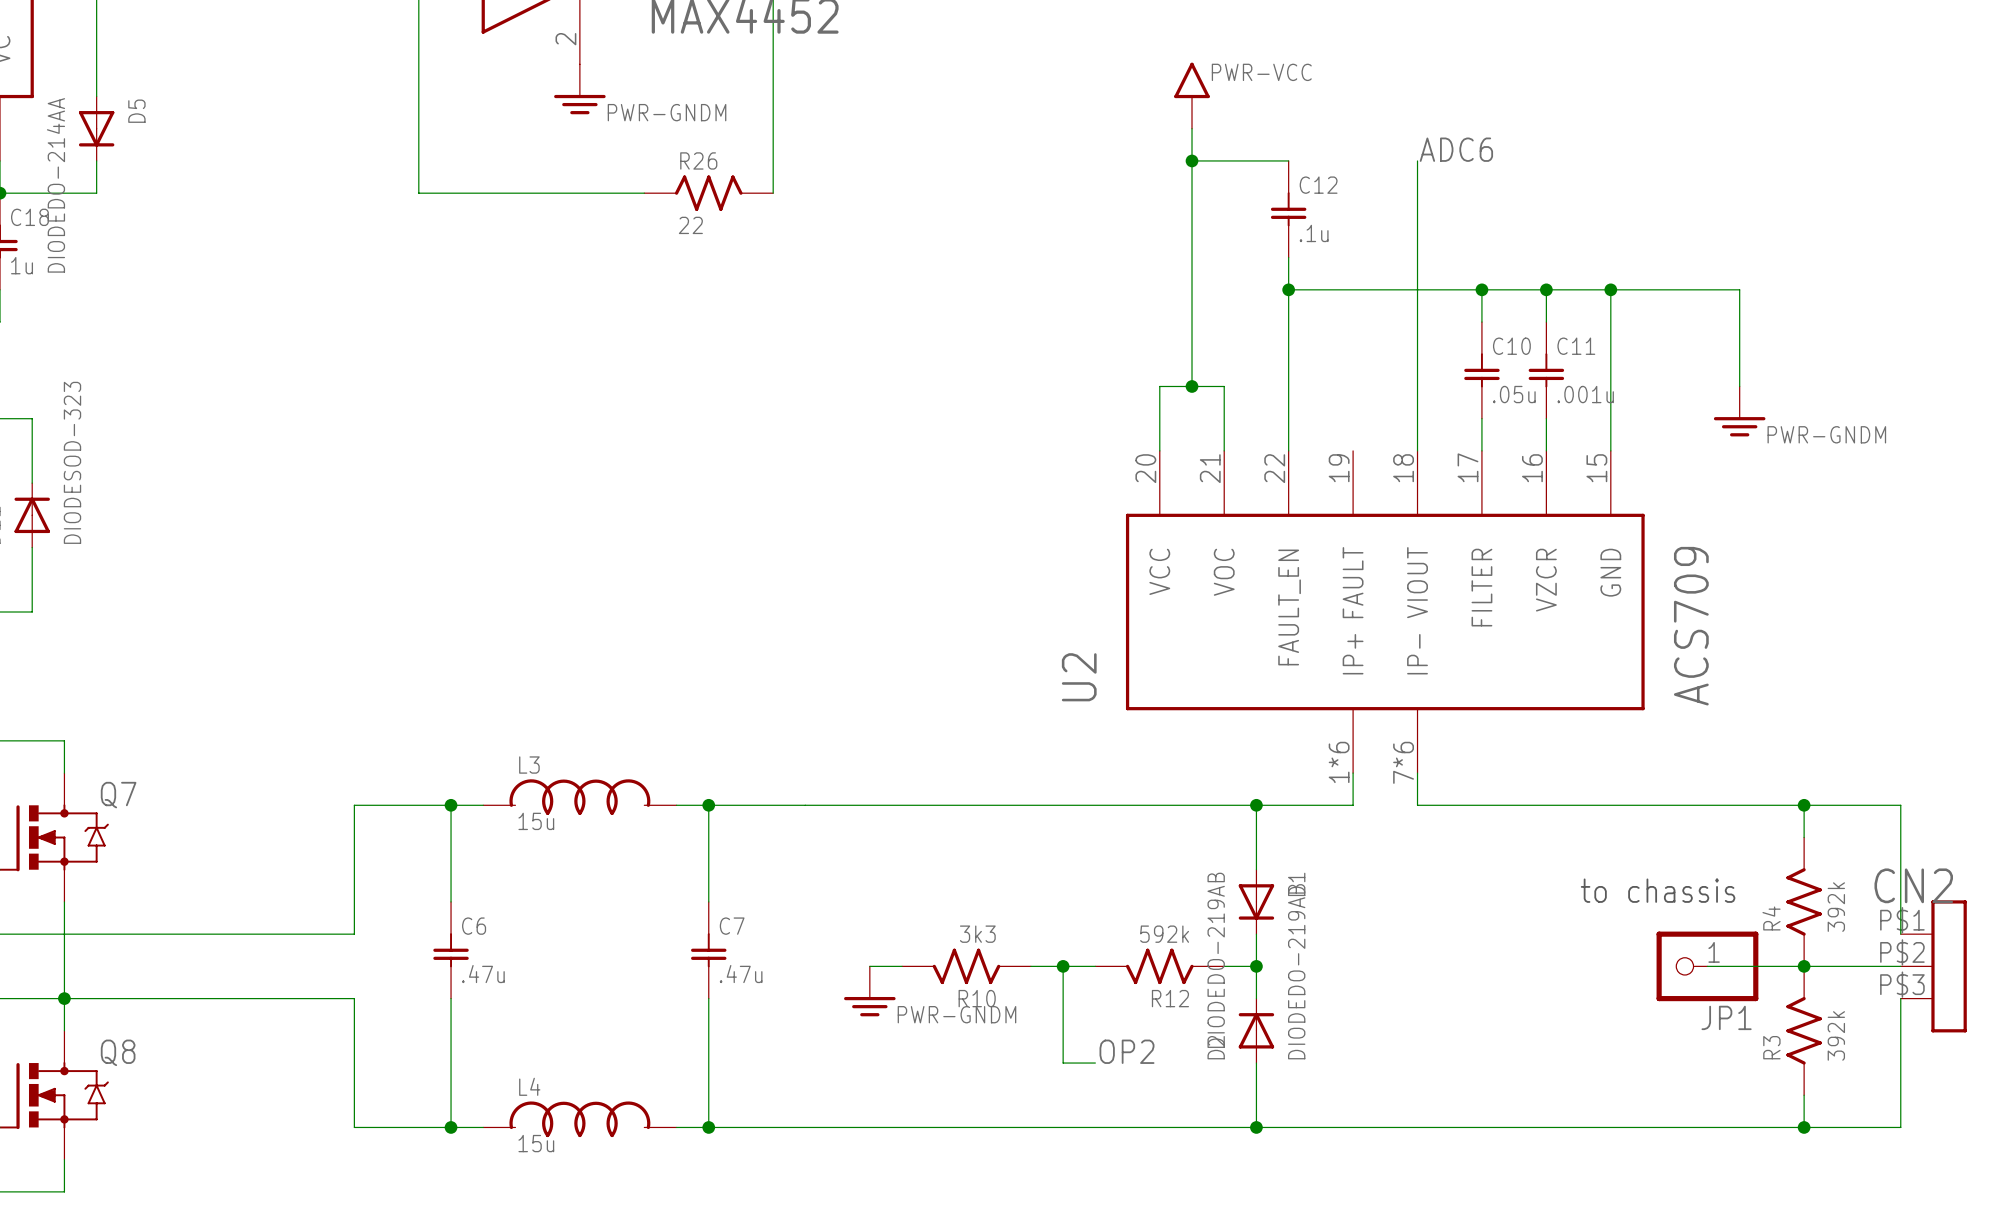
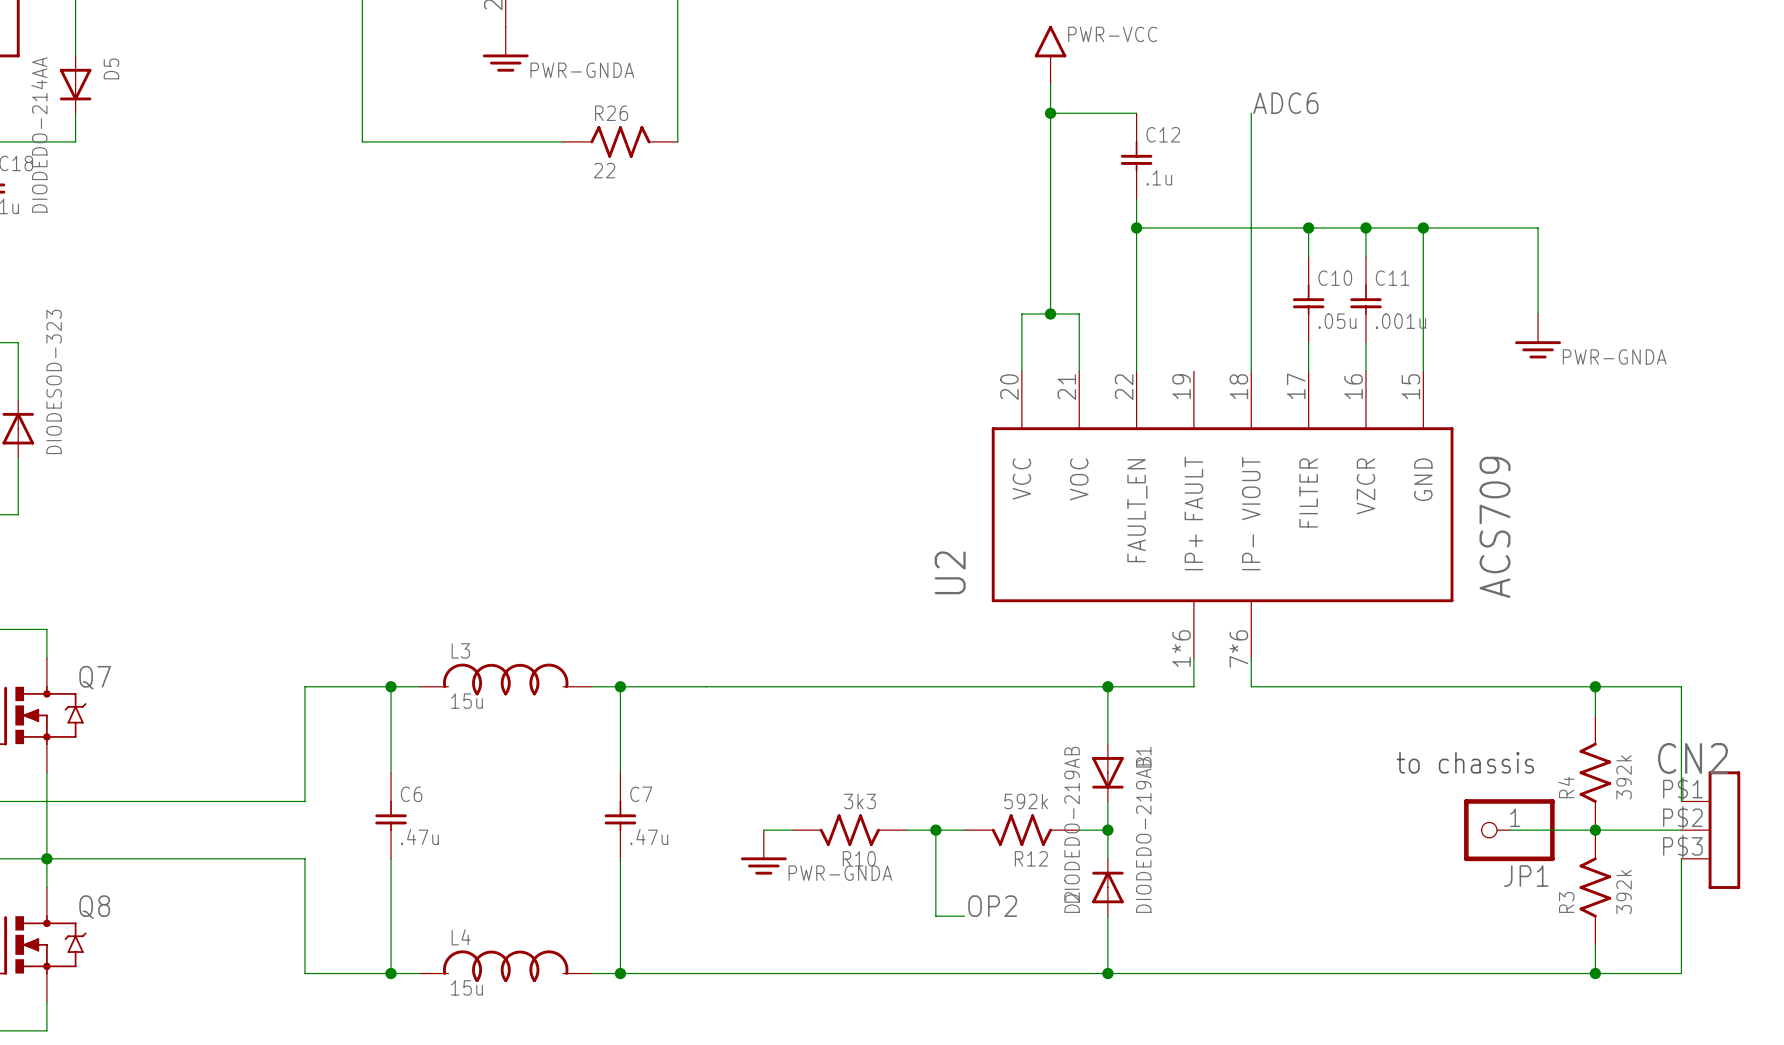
power symbol: PWR-GNDM (579, 89) -> PWR-GNDA (505, 49)
power symbol: PWR-GNDM (1739, 411) -> PWR-GNDA (1538, 336)
power symbol: PWR-GNDM (869, 991) -> PWR-GNDA (763, 852)

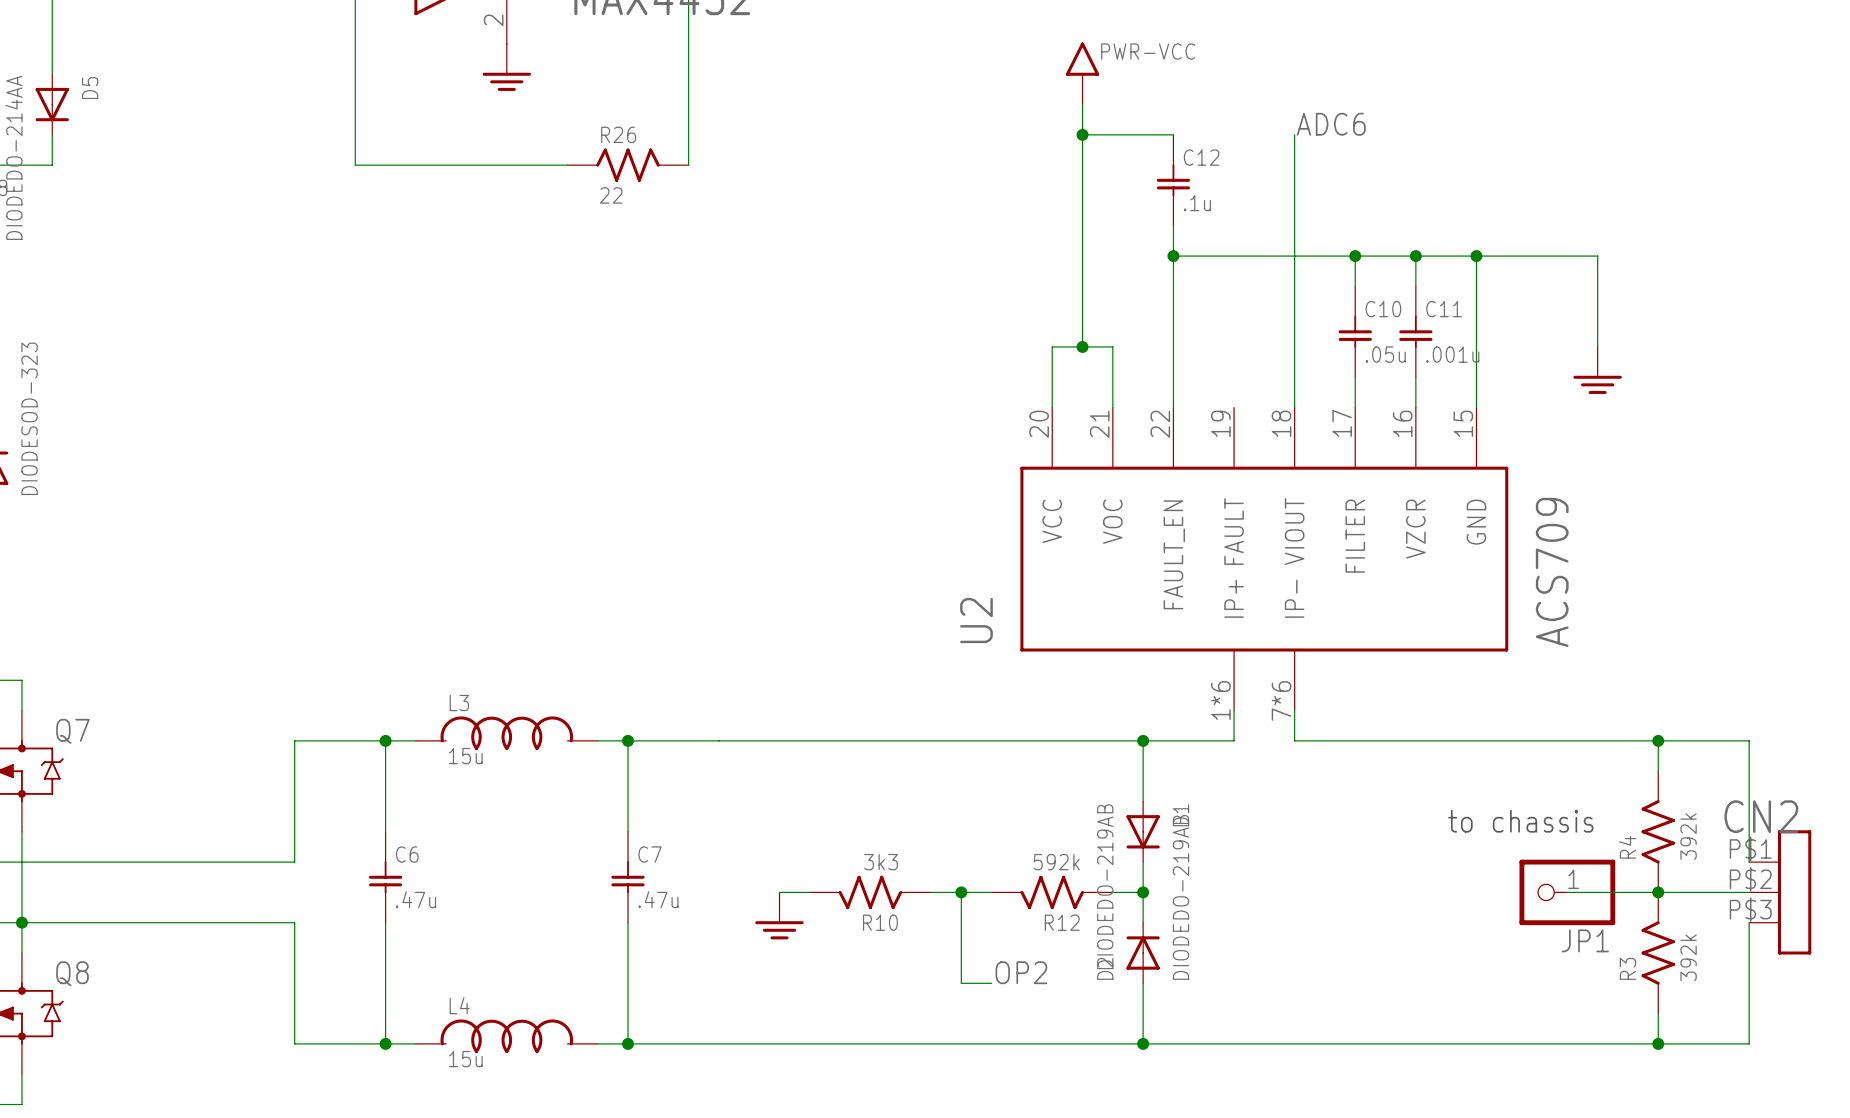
power symbol text: PWR-GNDA (582, 70) -> none
power symbol text: PWR-GNDA (1614, 357) -> none
power symbol text: PWR-GNDA (840, 873) -> none

